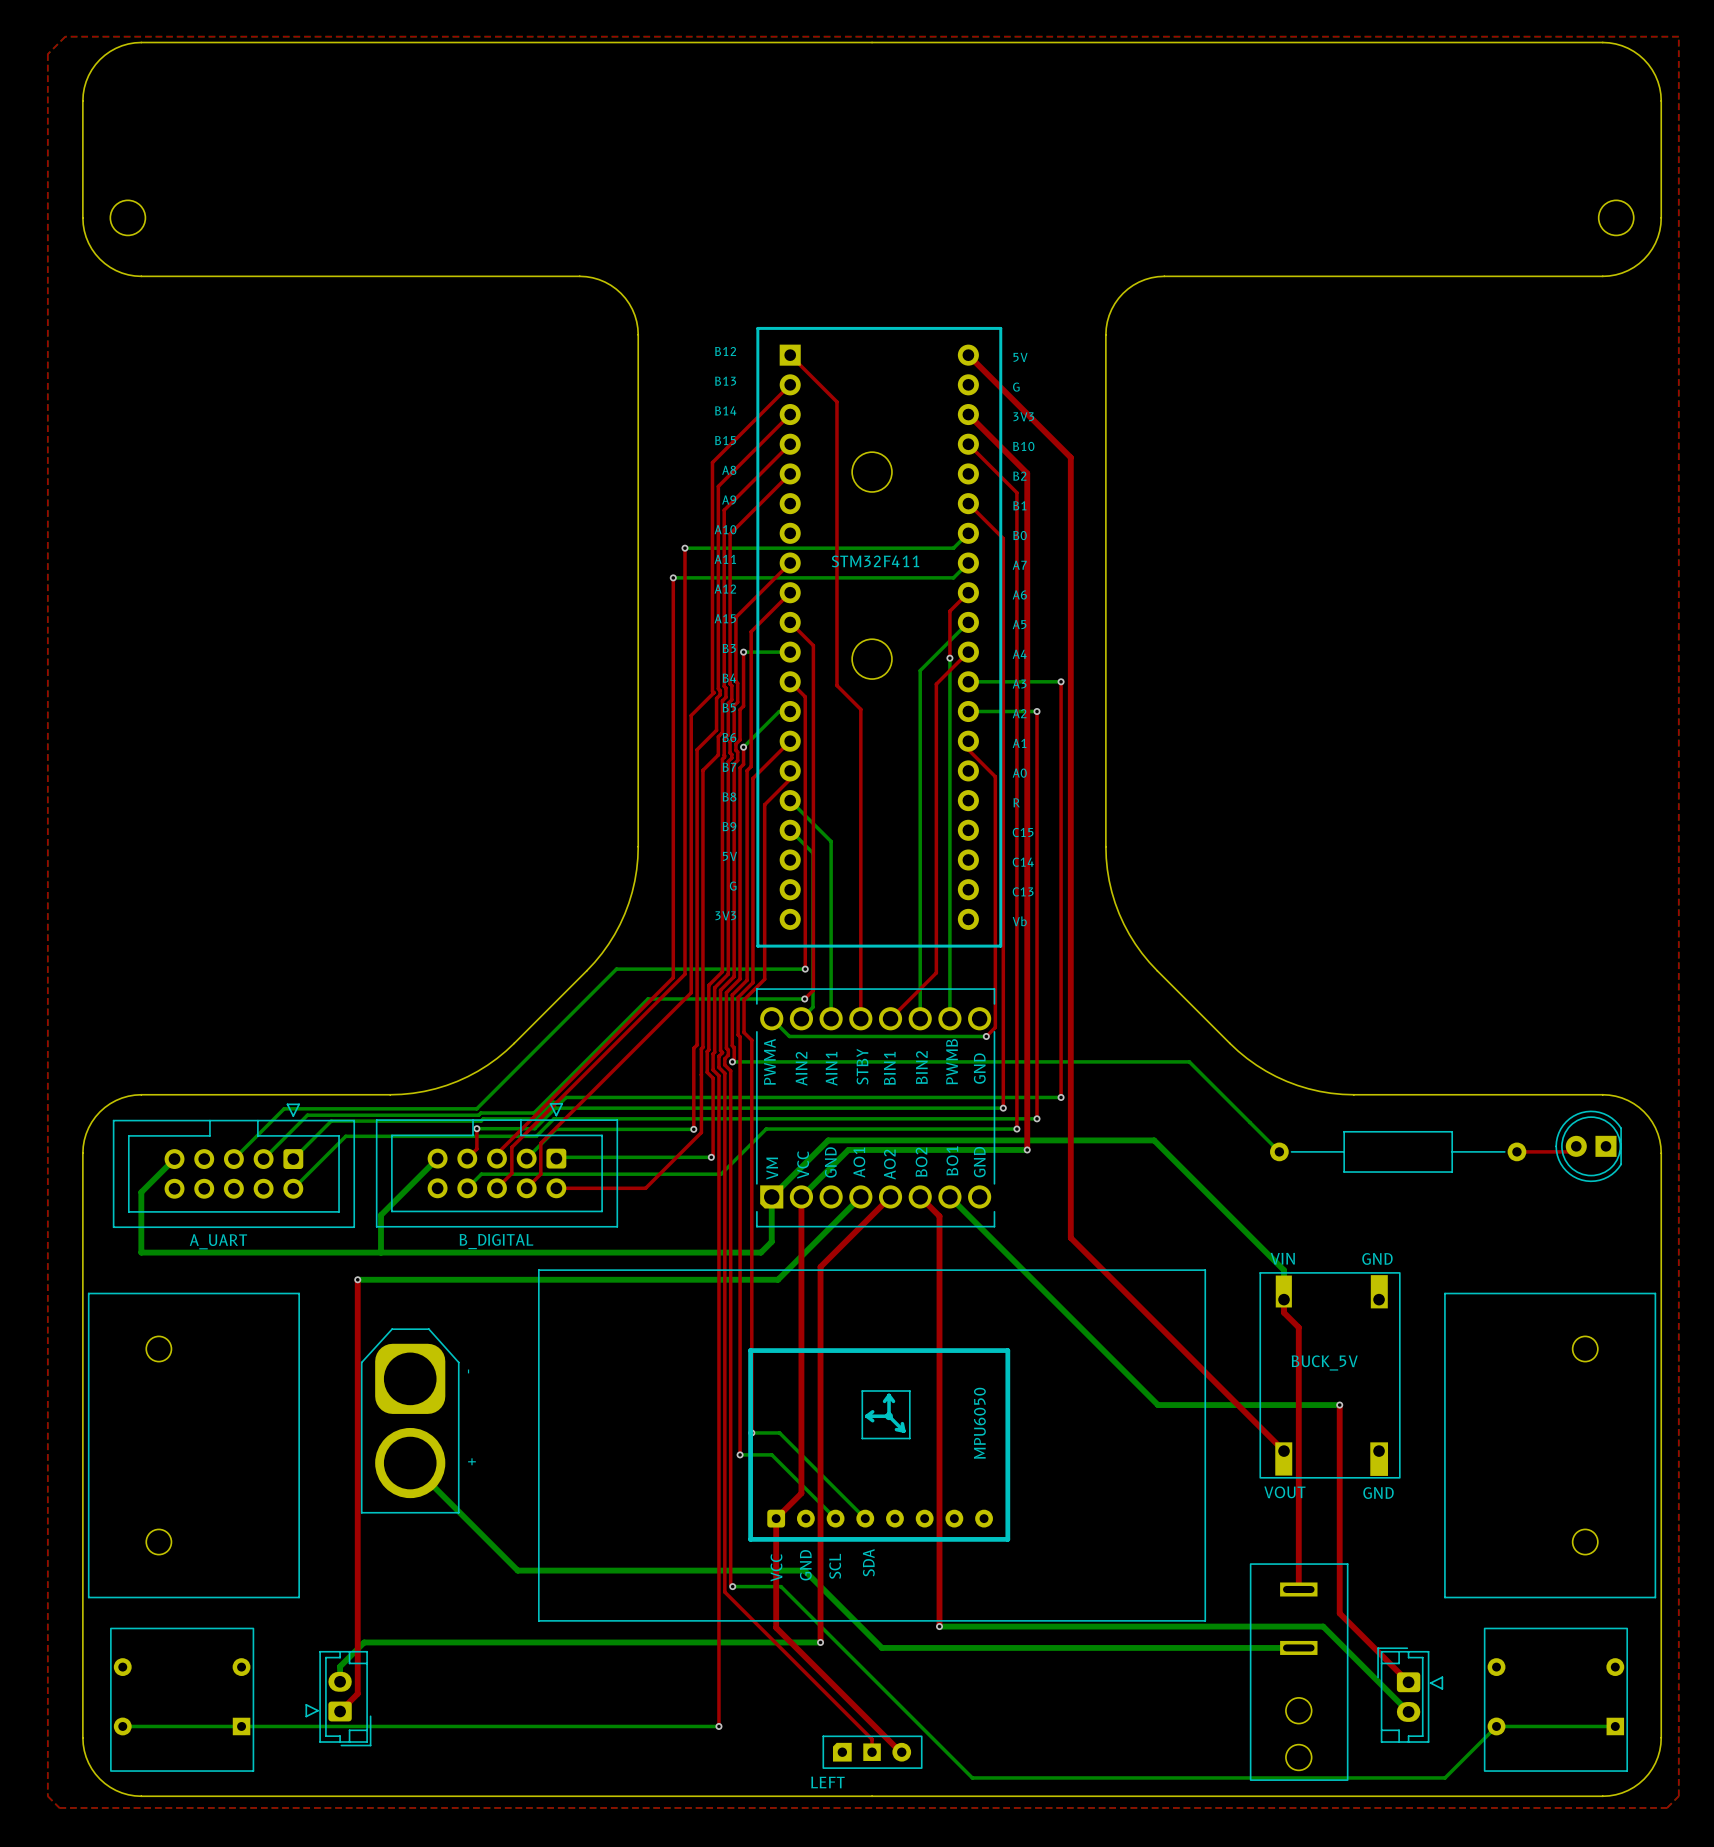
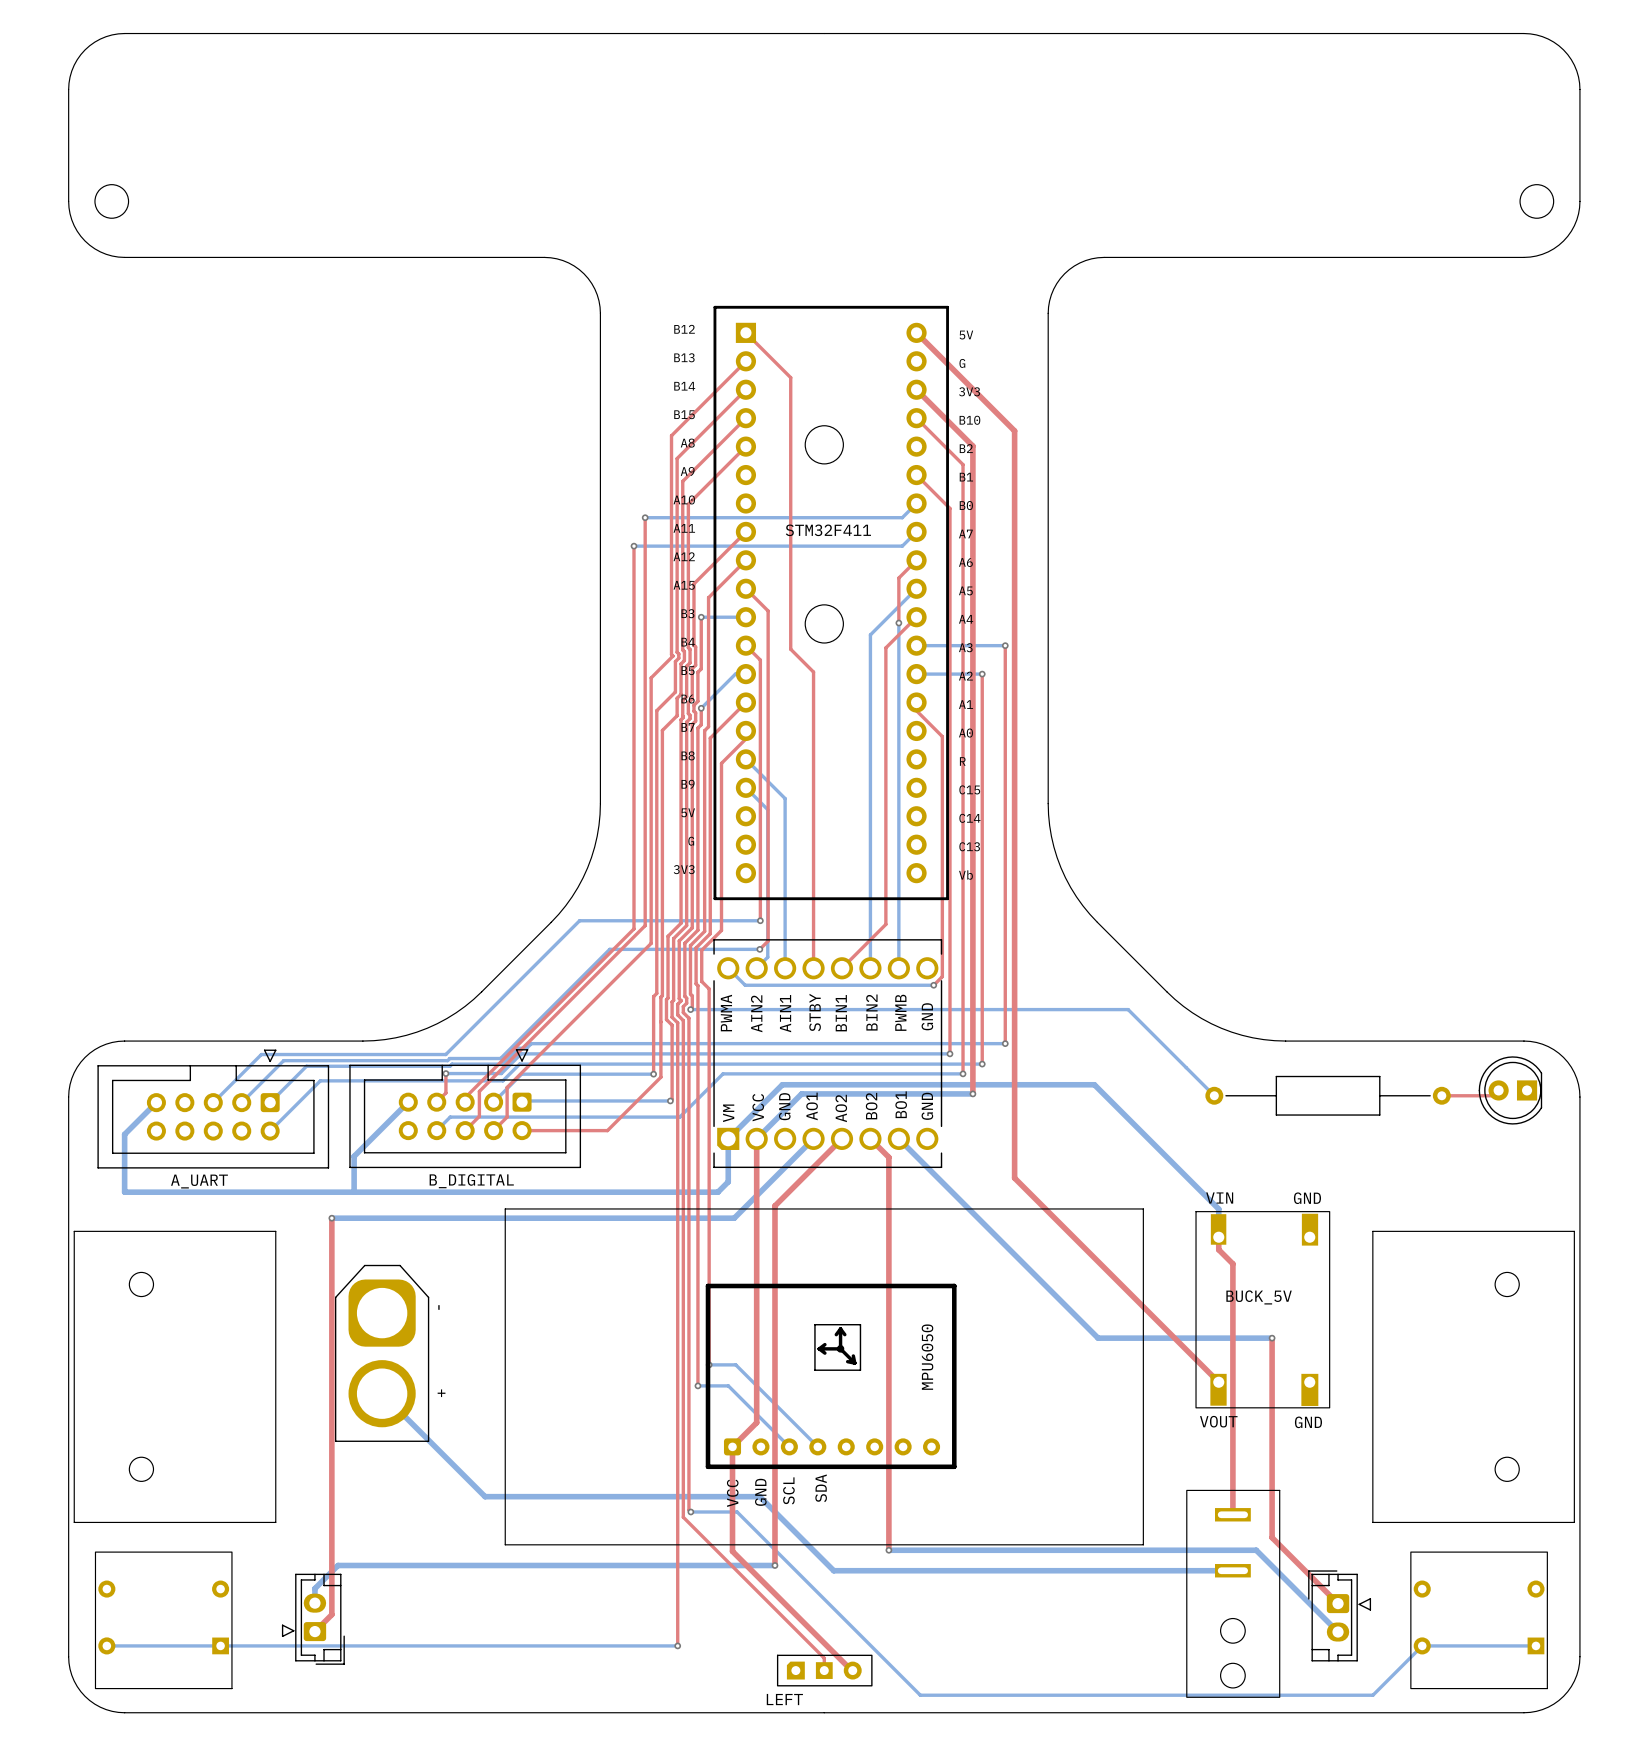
top zone outline: (65, 36) (1678, 36) (1678, 1796) (1667, 1807) (59, 1807) (47, 1796) (47, 54) (65, 36) -> none

